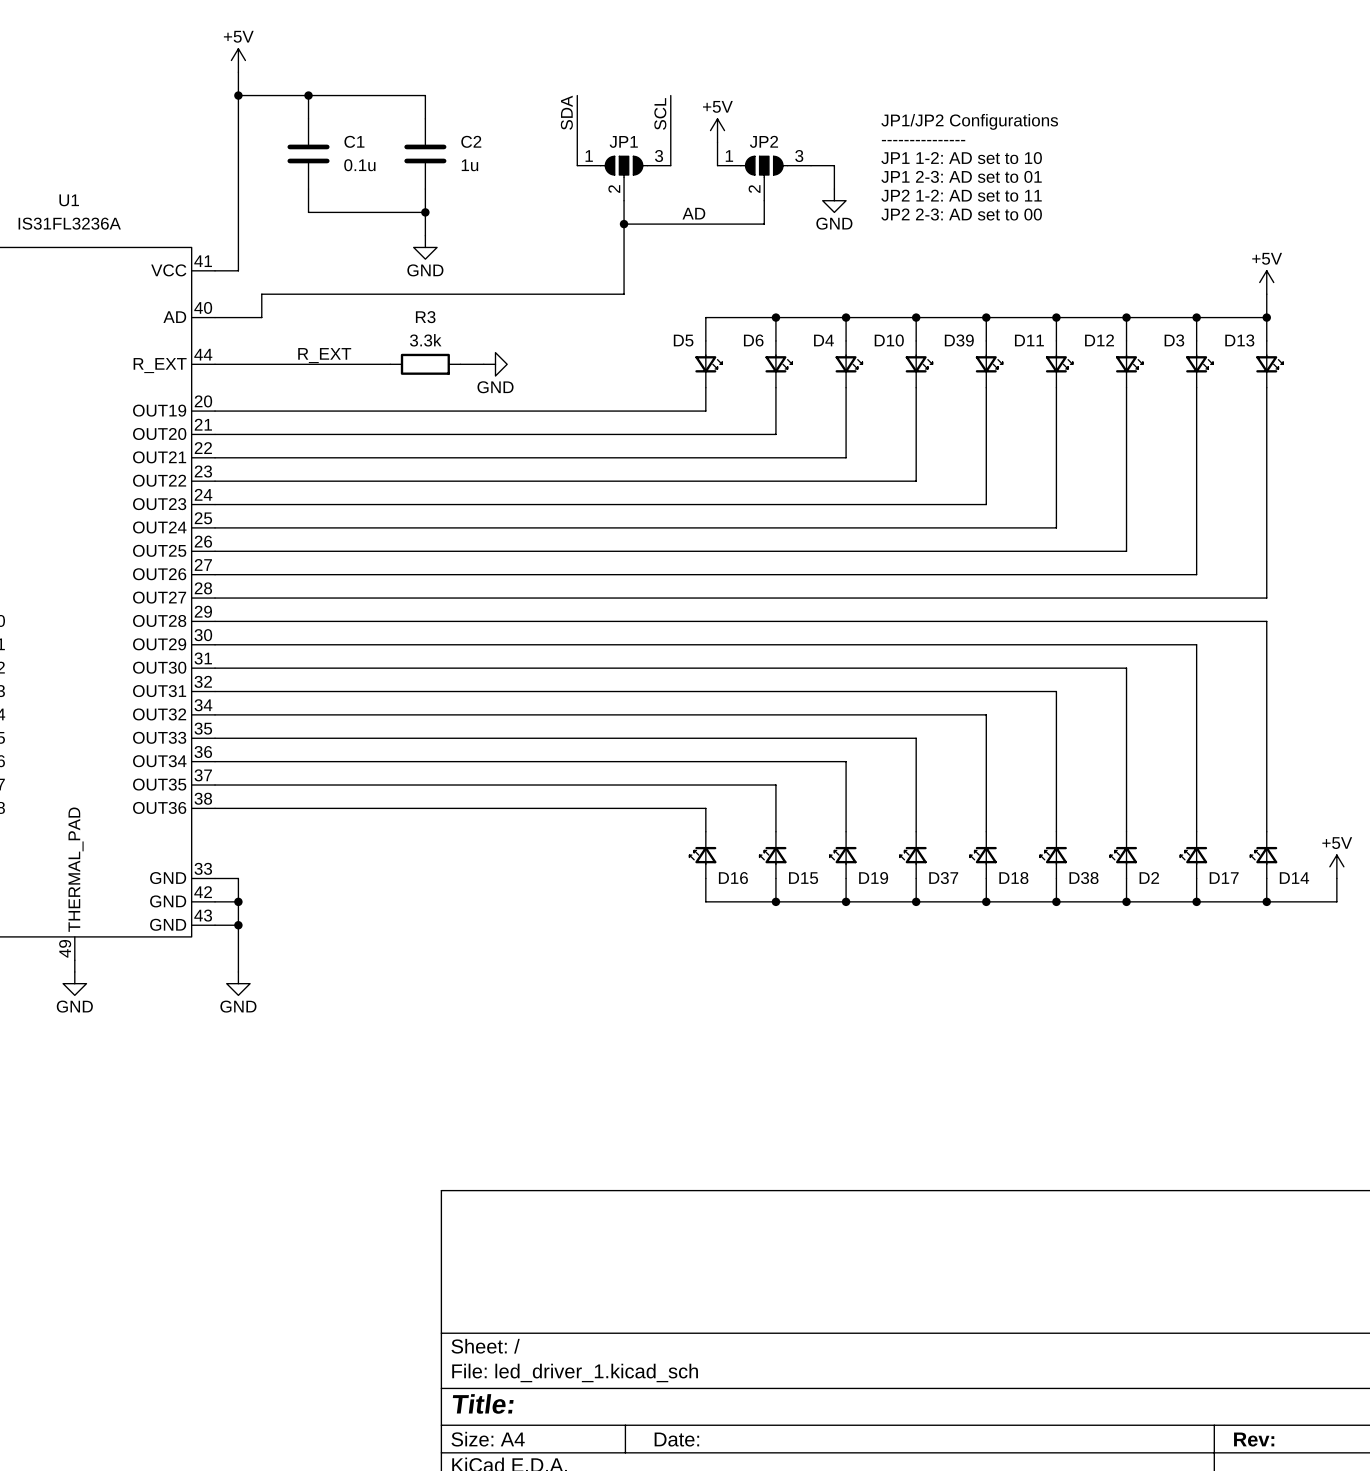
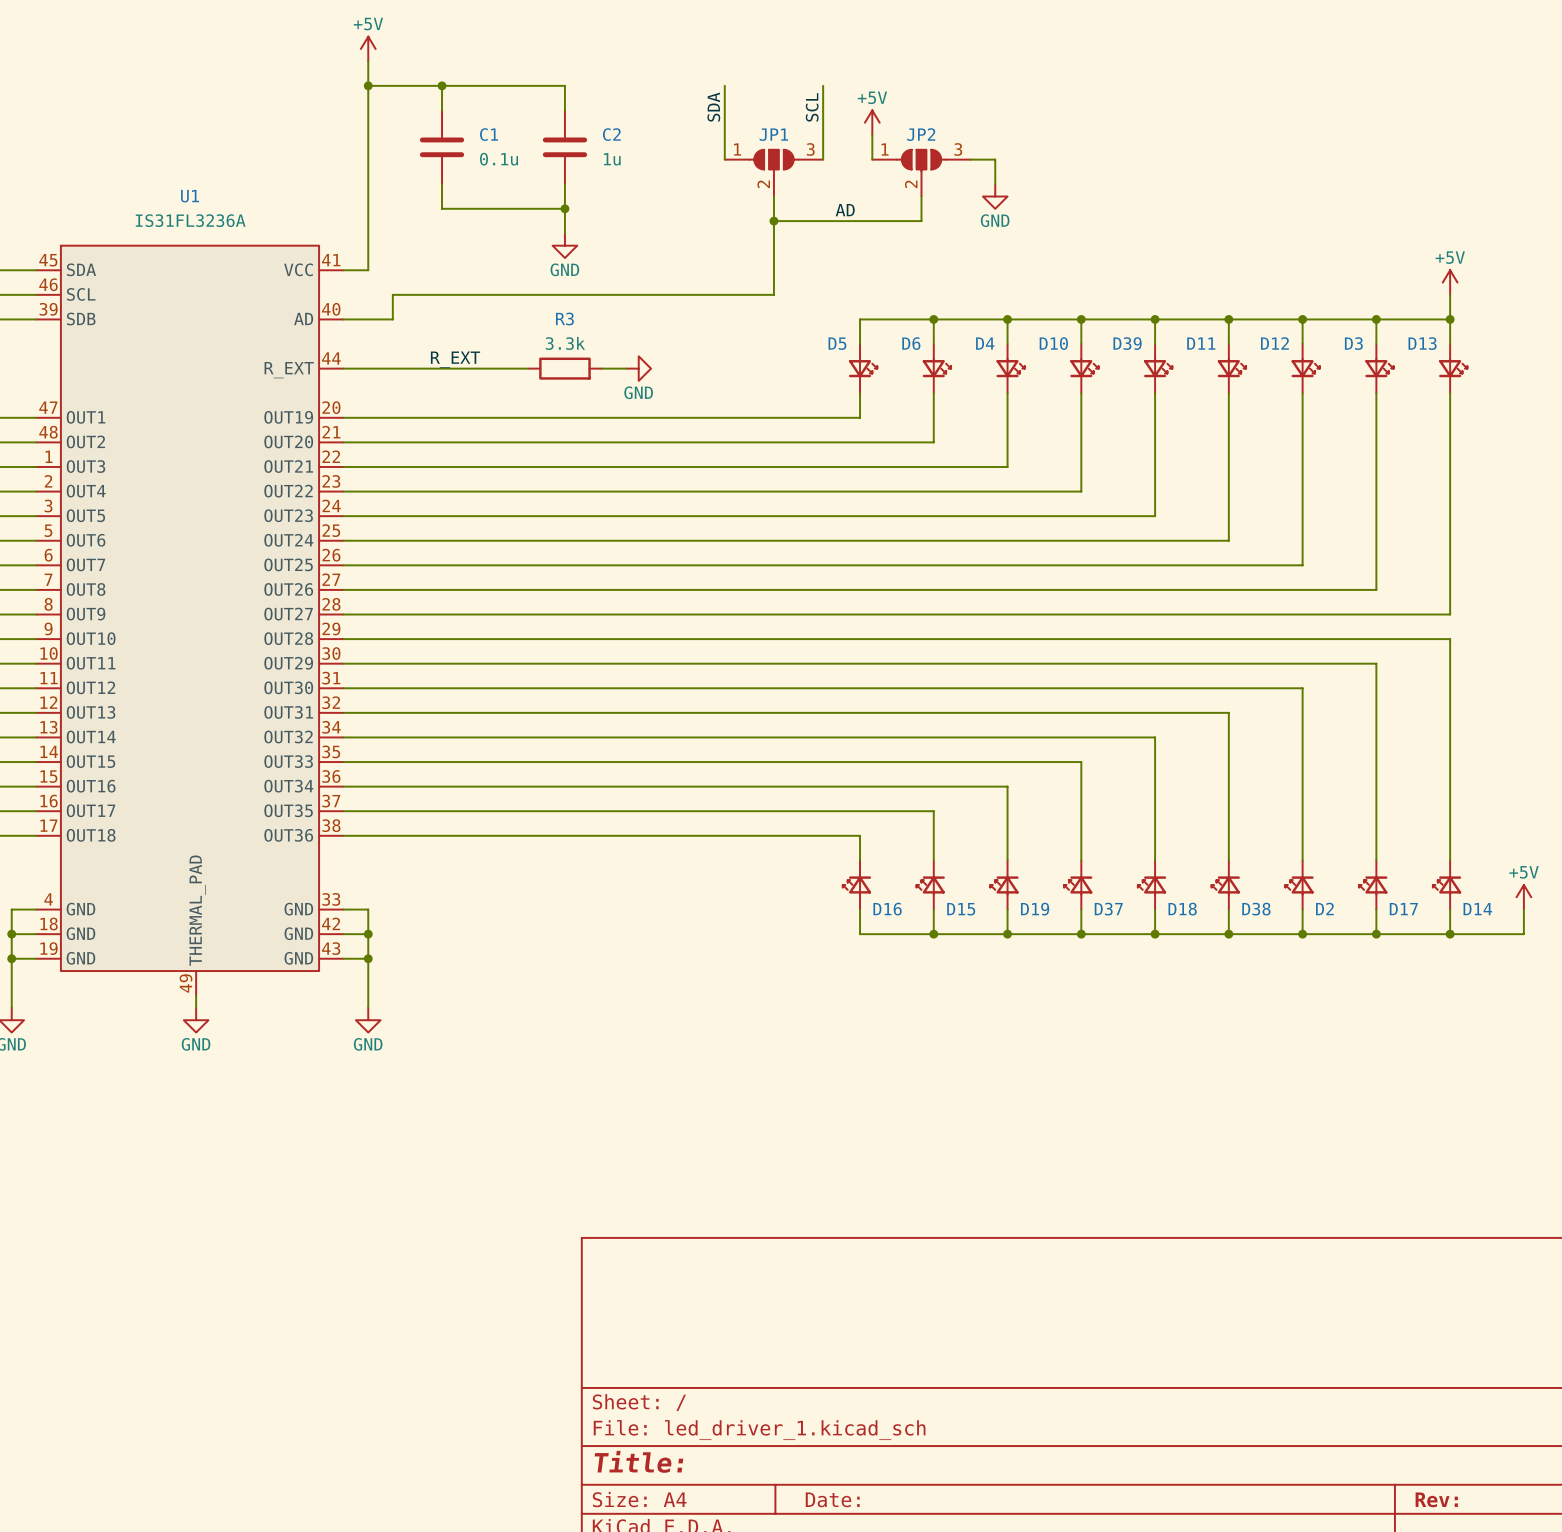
text: JP1/JP2 Configurations (969, 121) -> none
text: --------------- (923, 140) -> none
text: JP1 1-2: AD set to 10 (961, 158) -> none
text: JP1 2-3: AD set to 01 (961, 176) -> none
text: JP2 1-2: AD set to 11 (961, 195) -> none
text: JP2 2-3: AD set to 00 (961, 214) -> none

